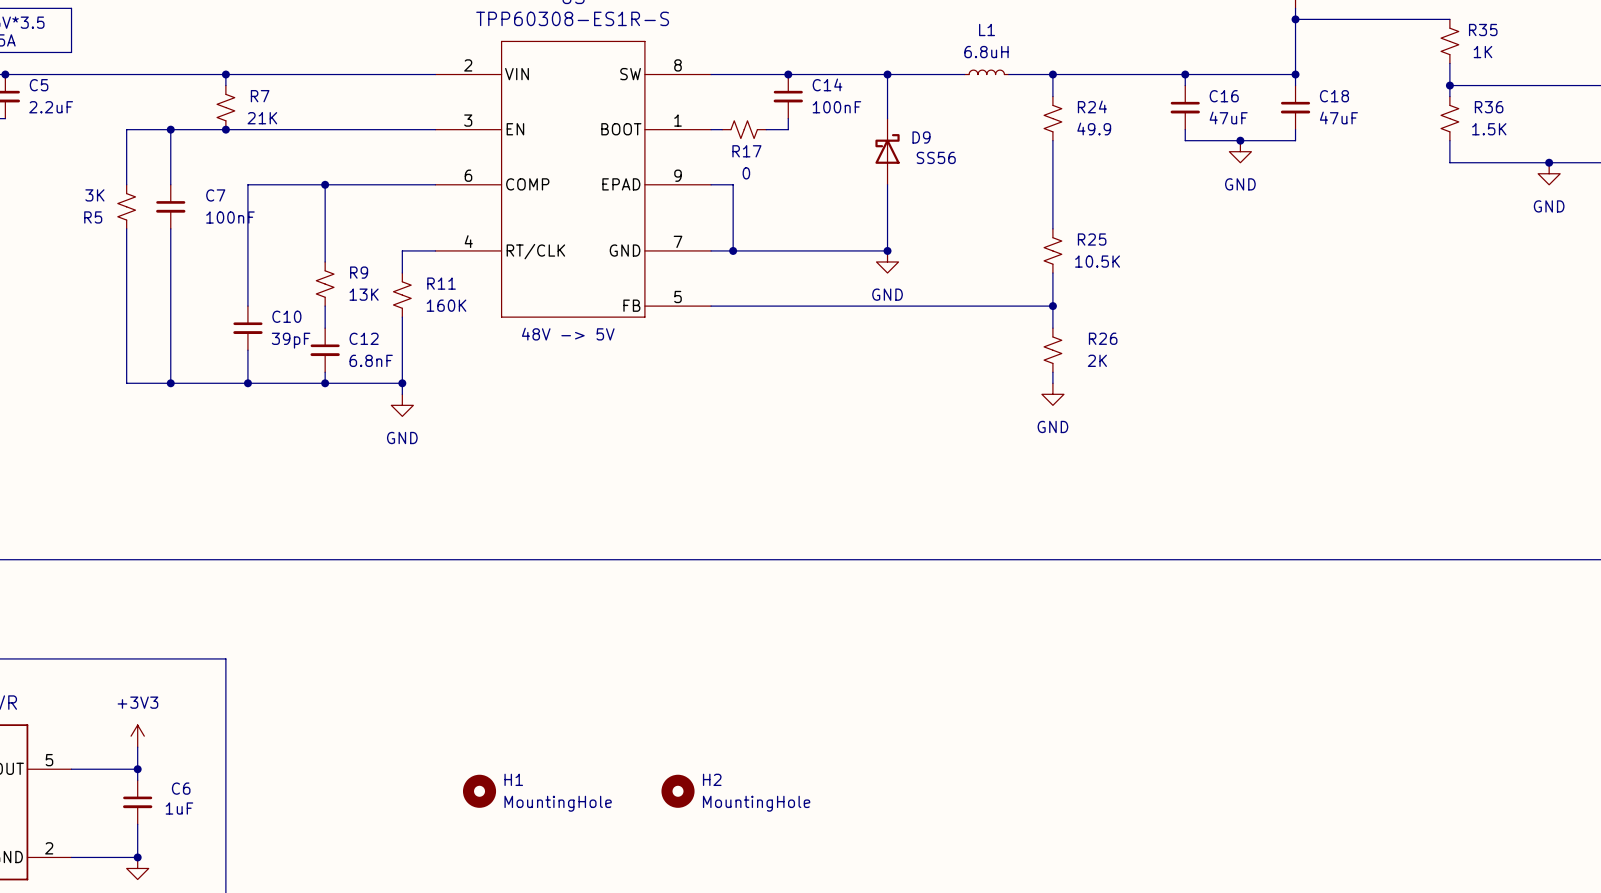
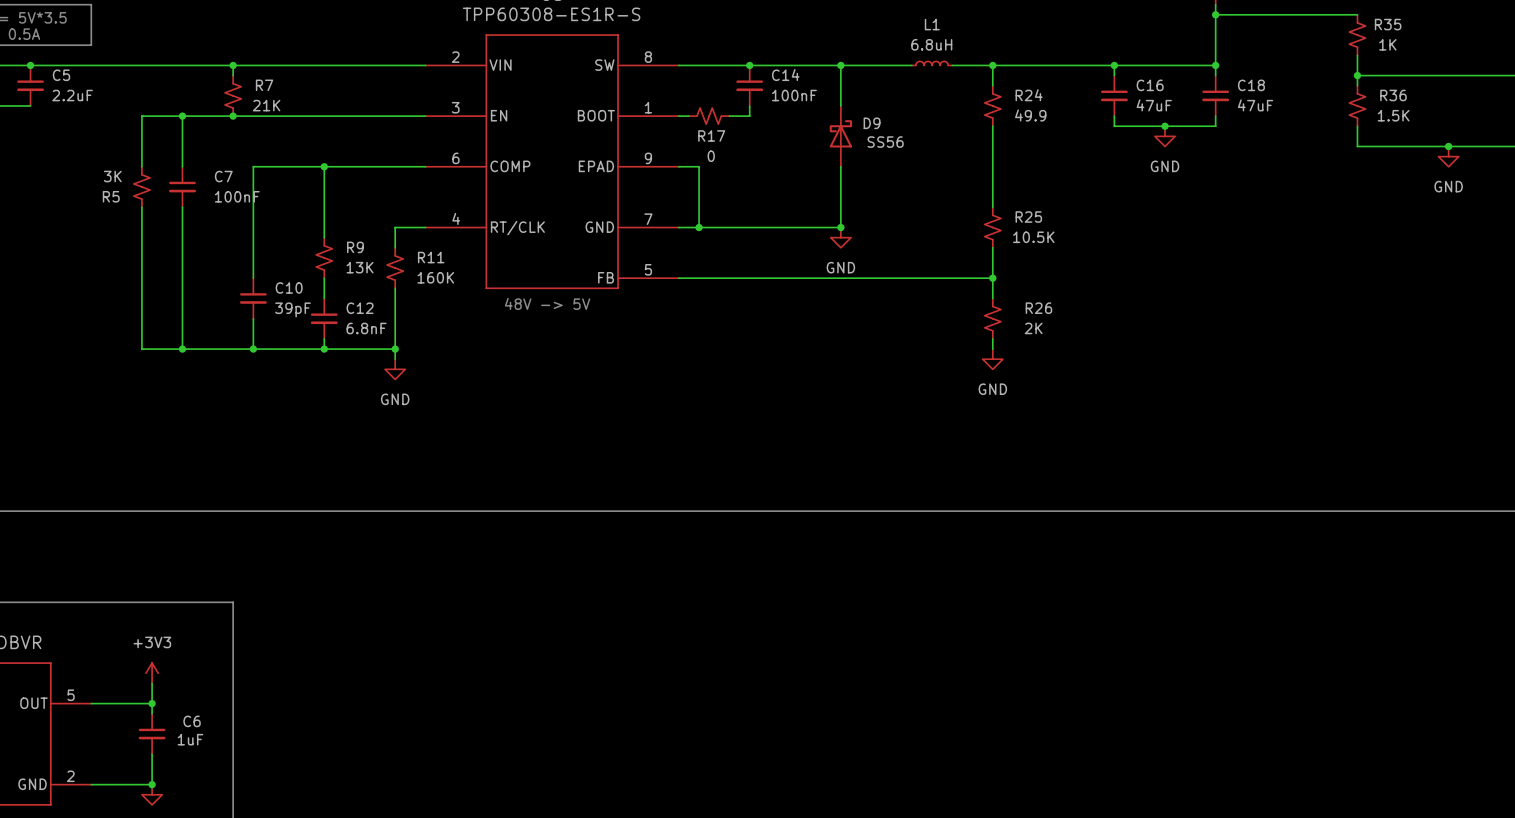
H1: MountingHole (479, 791) -> none
H2: MountingHole (678, 791) -> none

